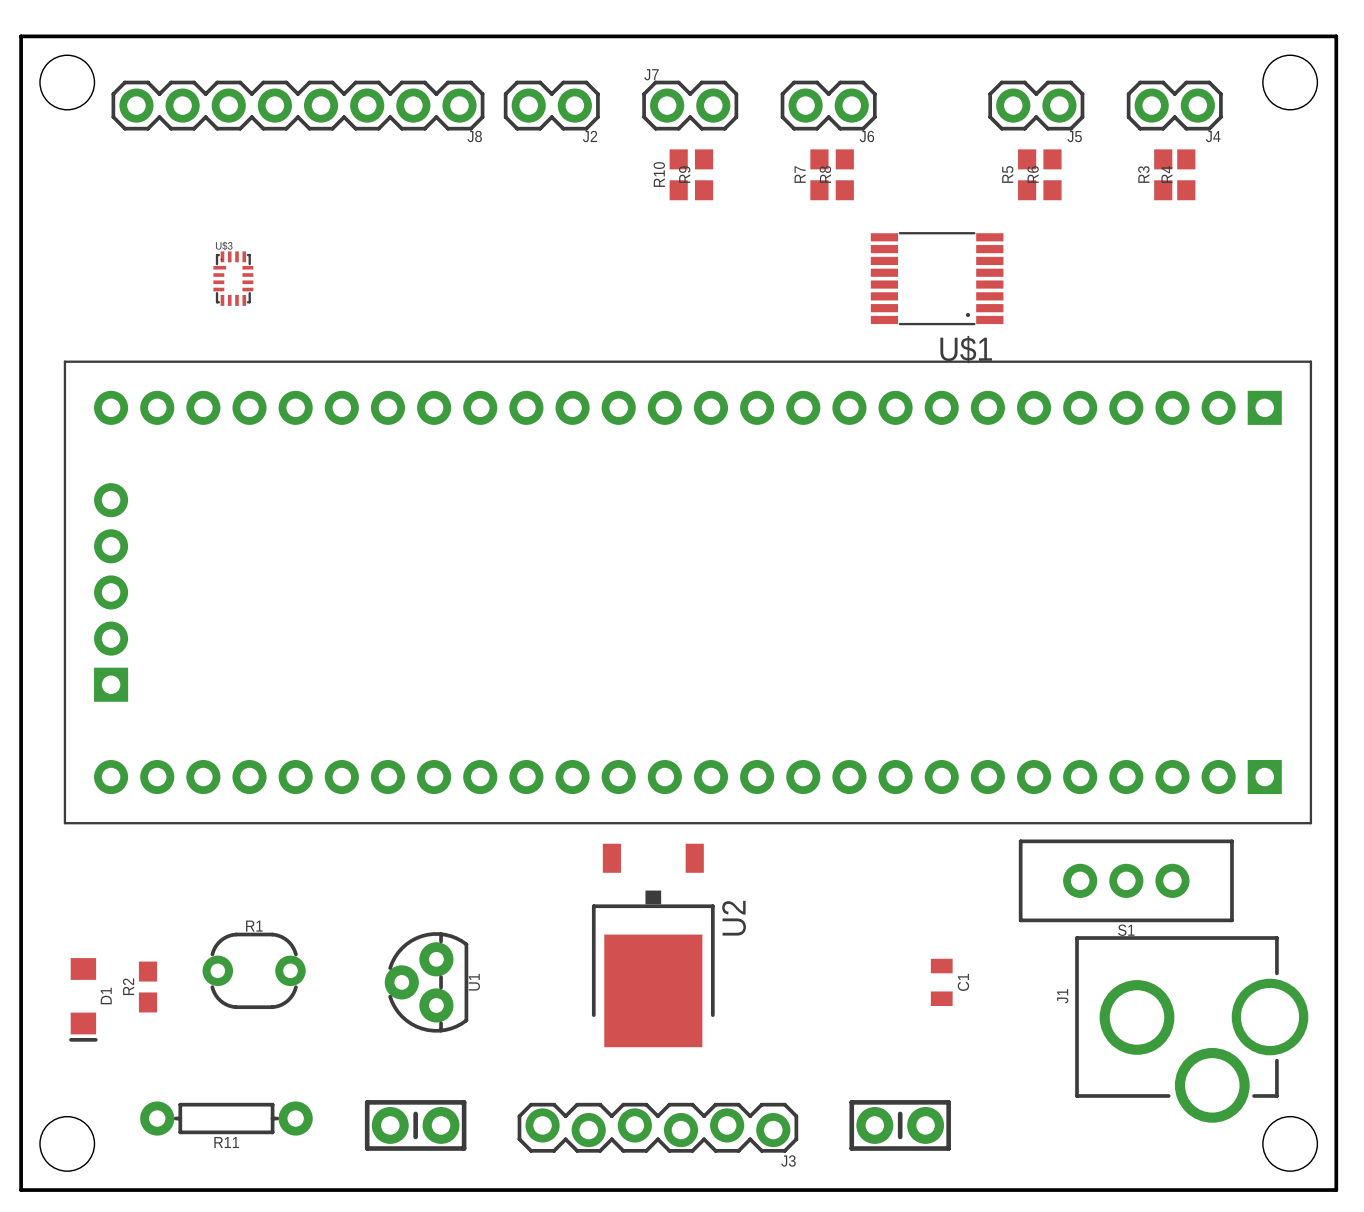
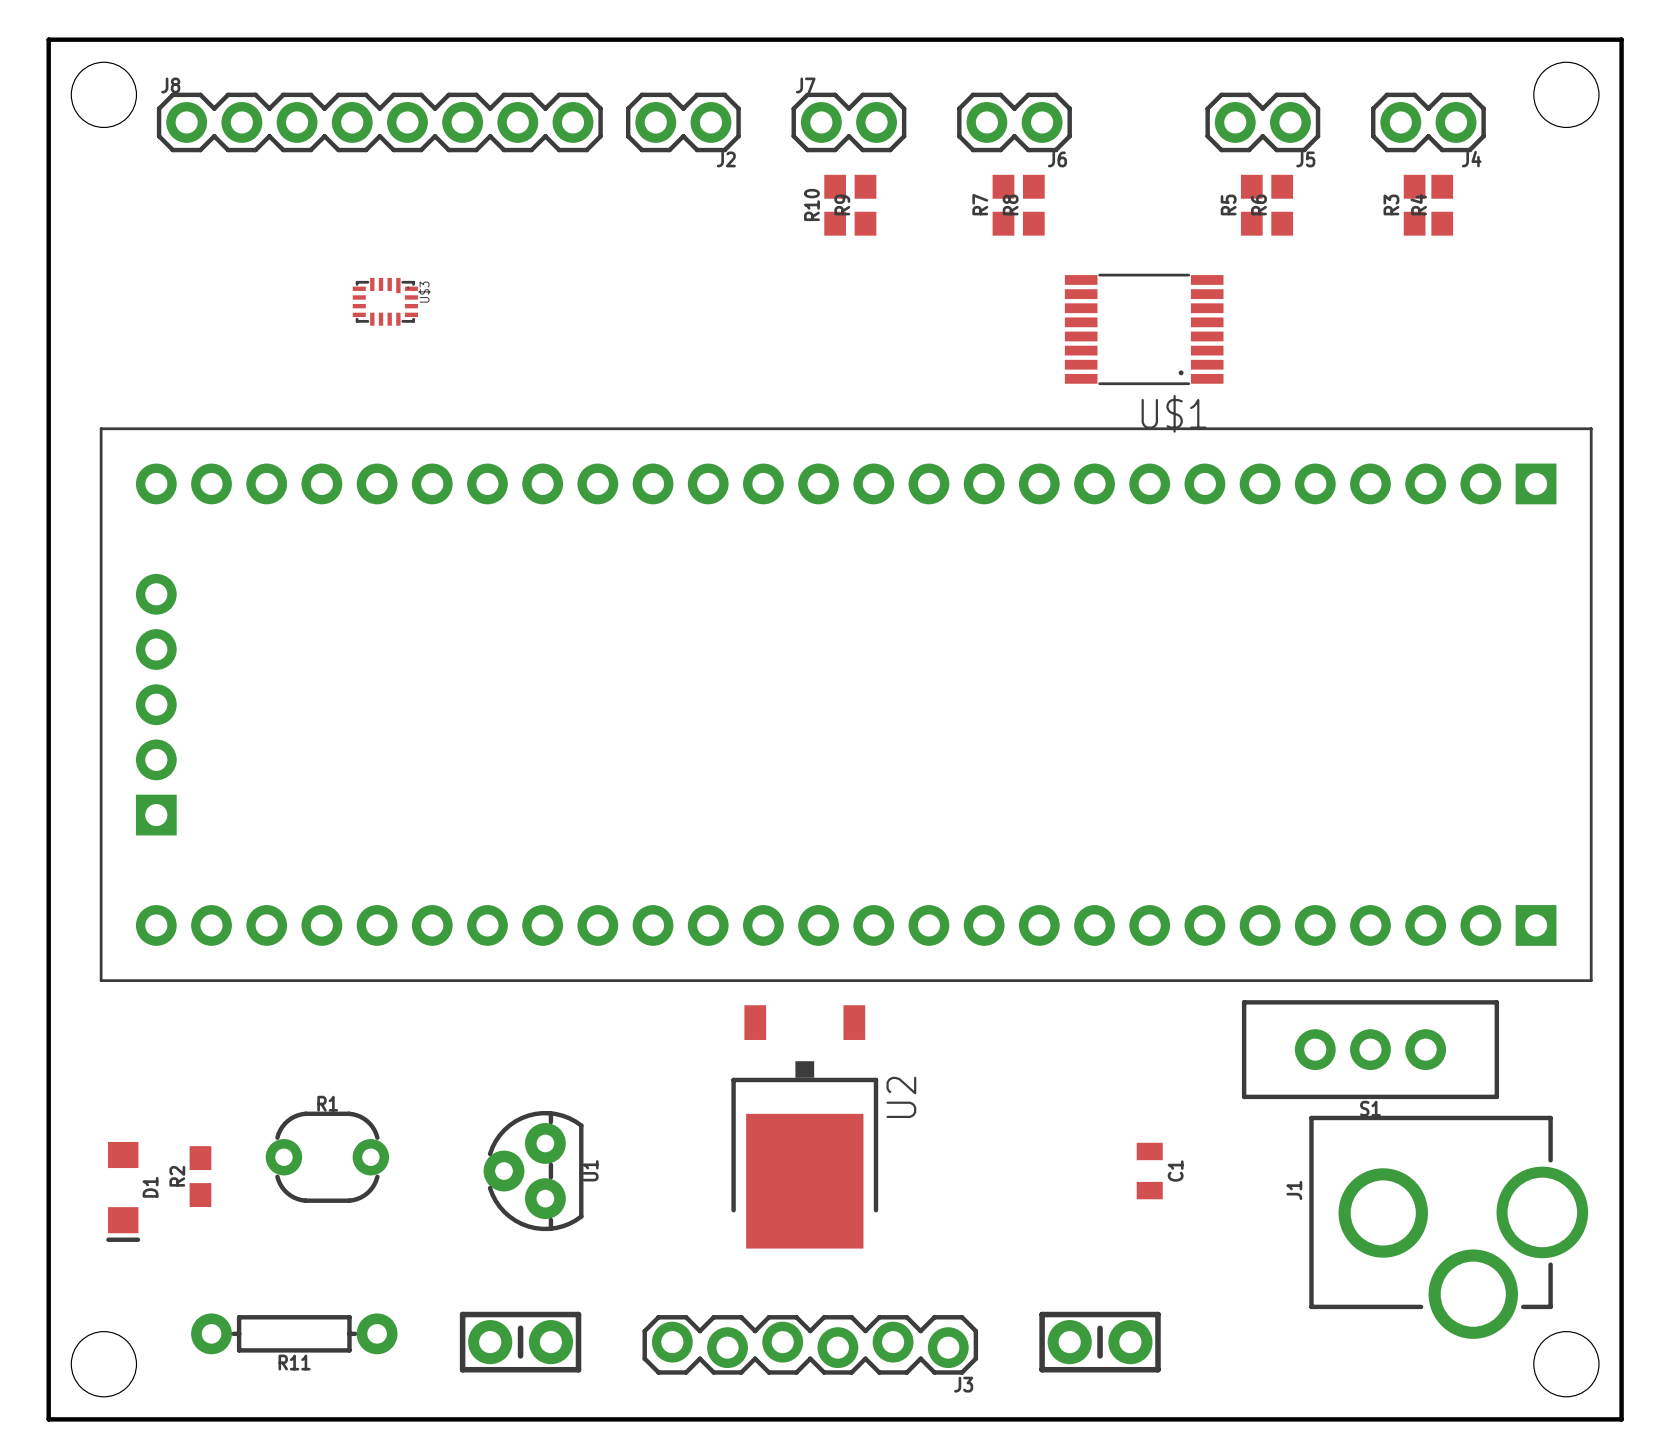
J8 name position: J8 (474, 136) -> J8 (170, 85)
U$3 rotation: 0° (233, 278) -> 90° clockwise (385, 301)
U$3 position: (233, 278) -> (385, 301)

